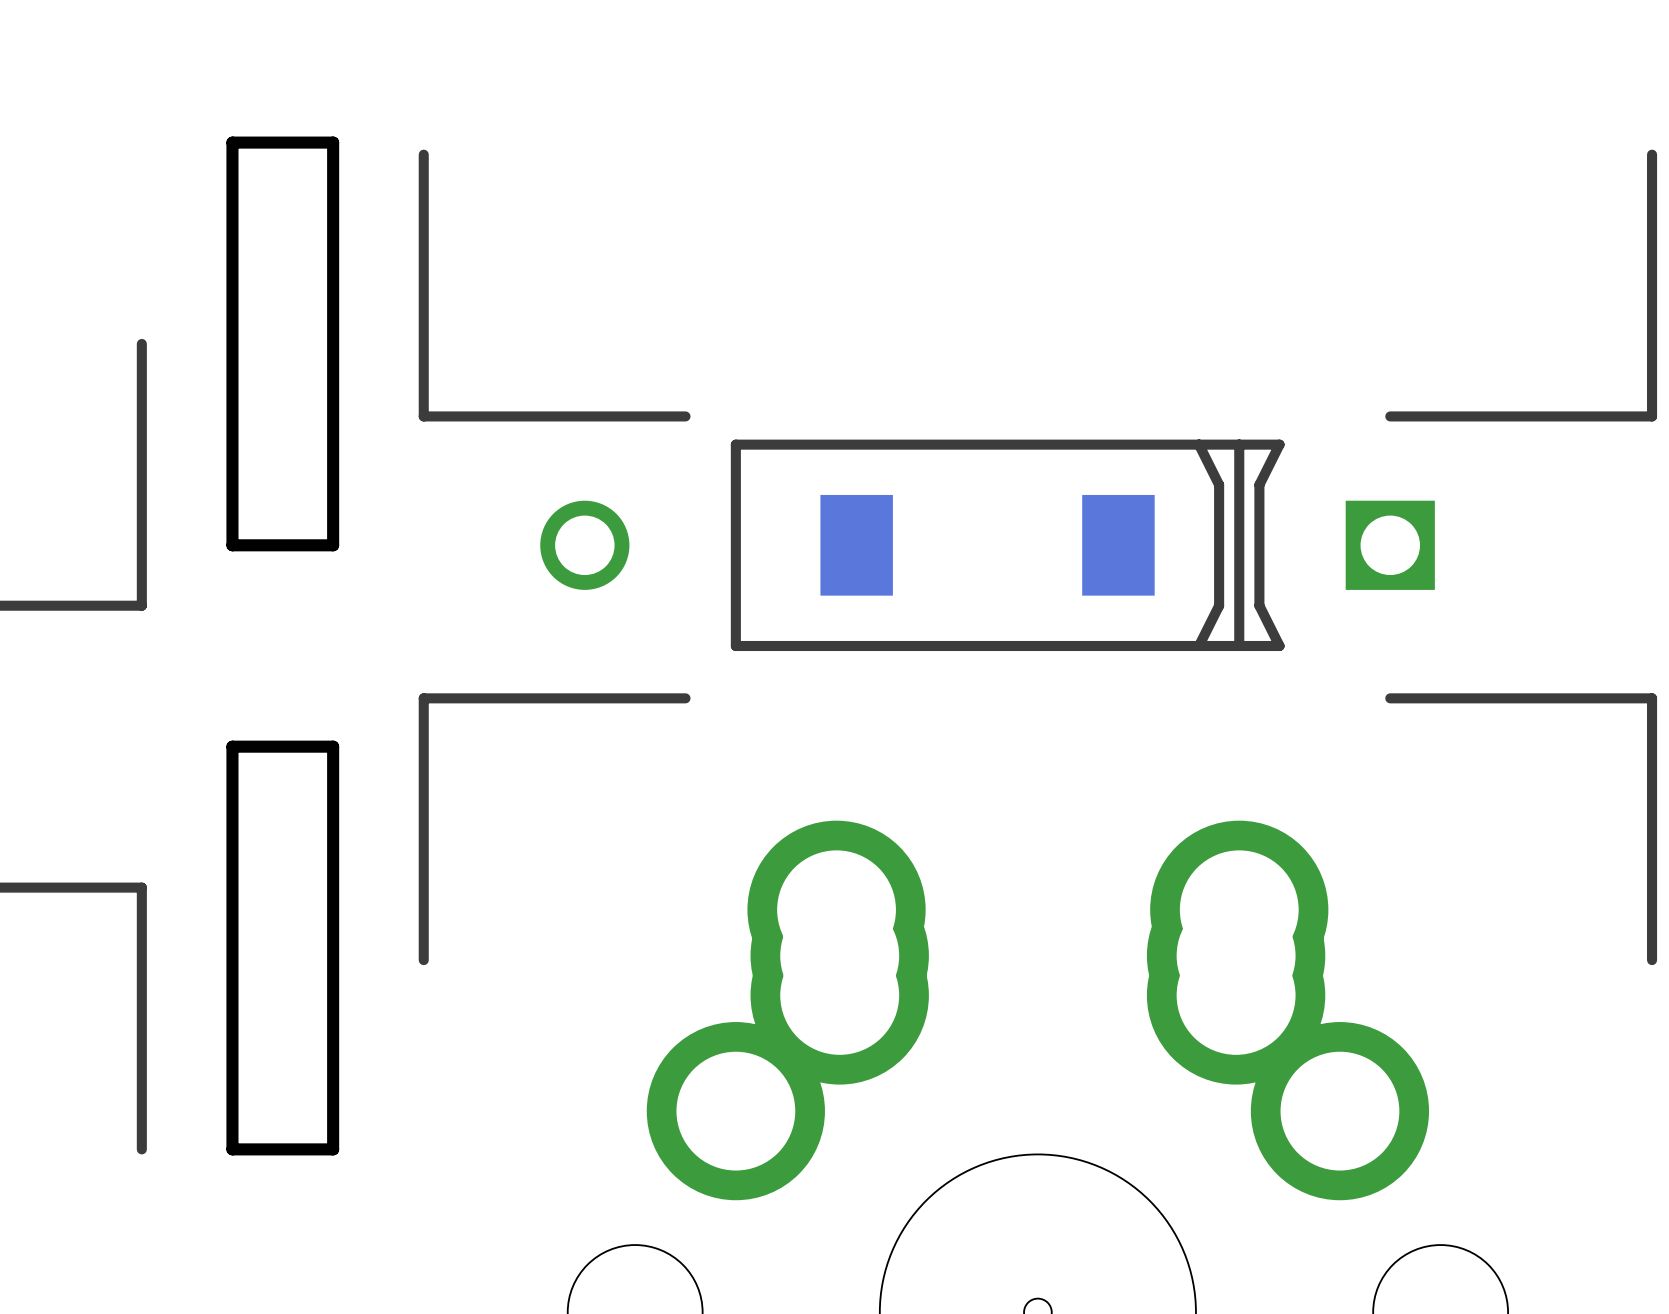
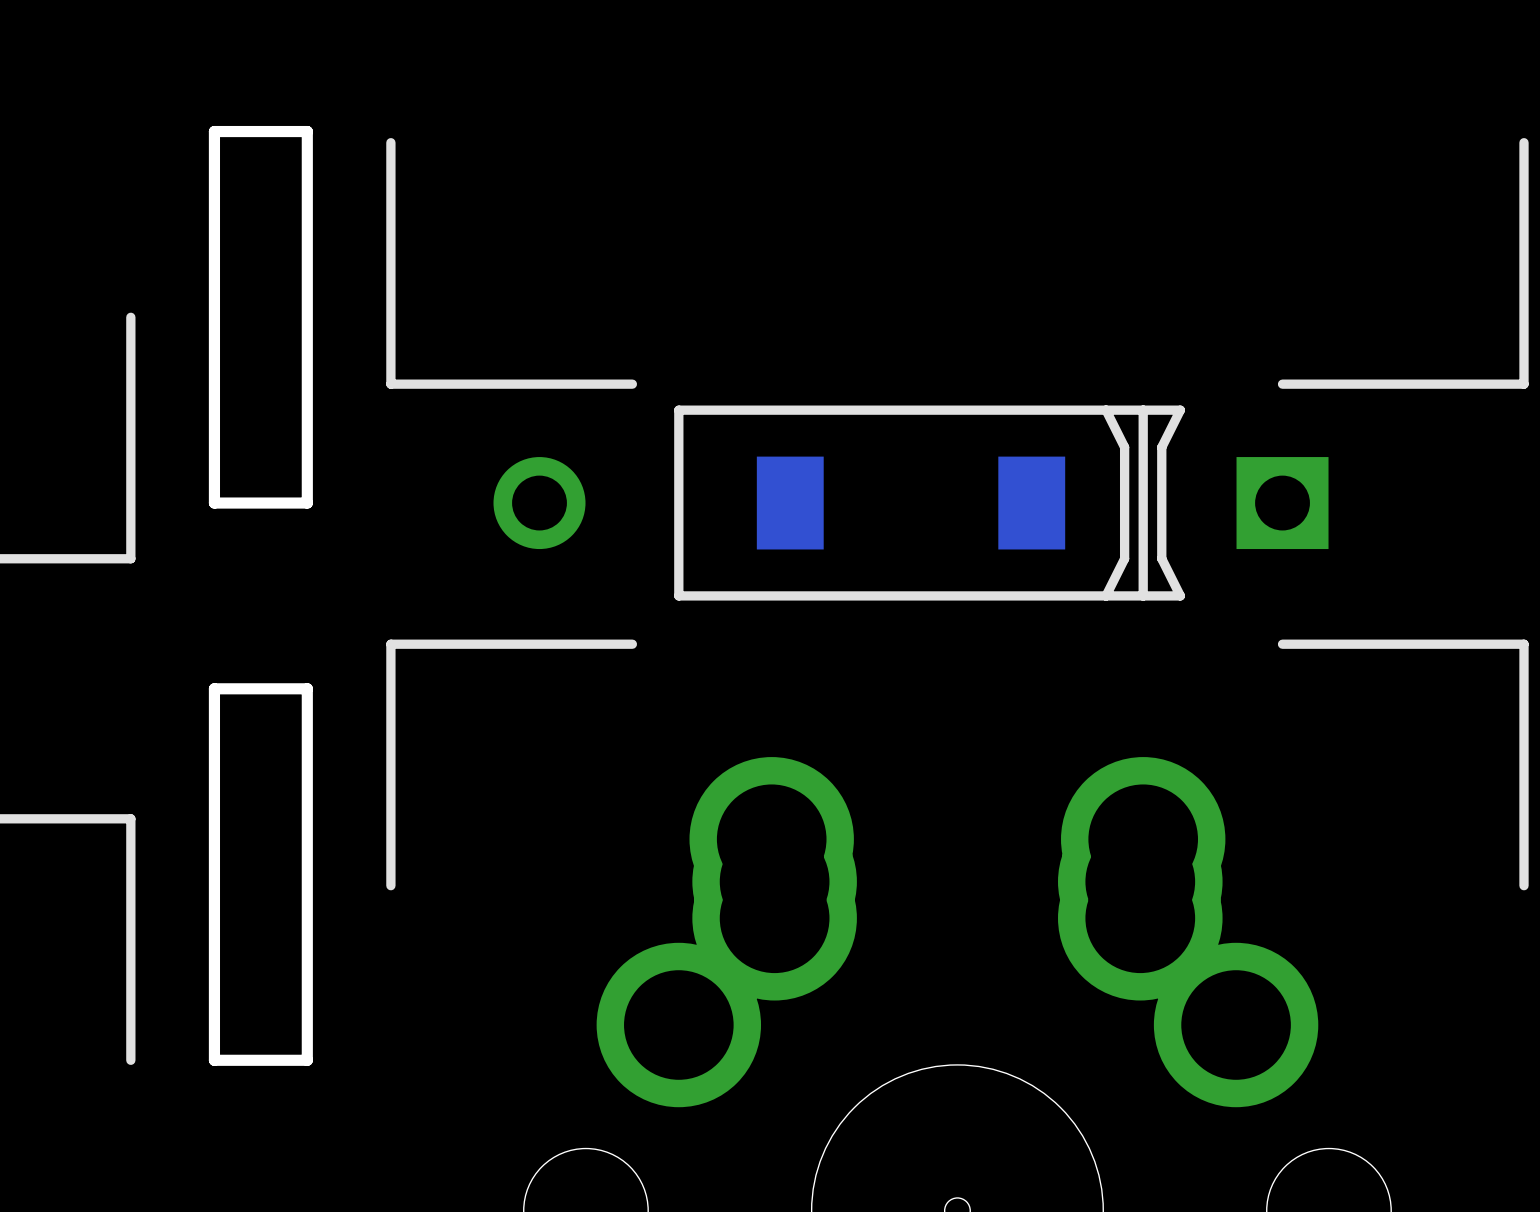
part footprint: [540, 439, 1435, 652] -> [493, 405, 1329, 601]

